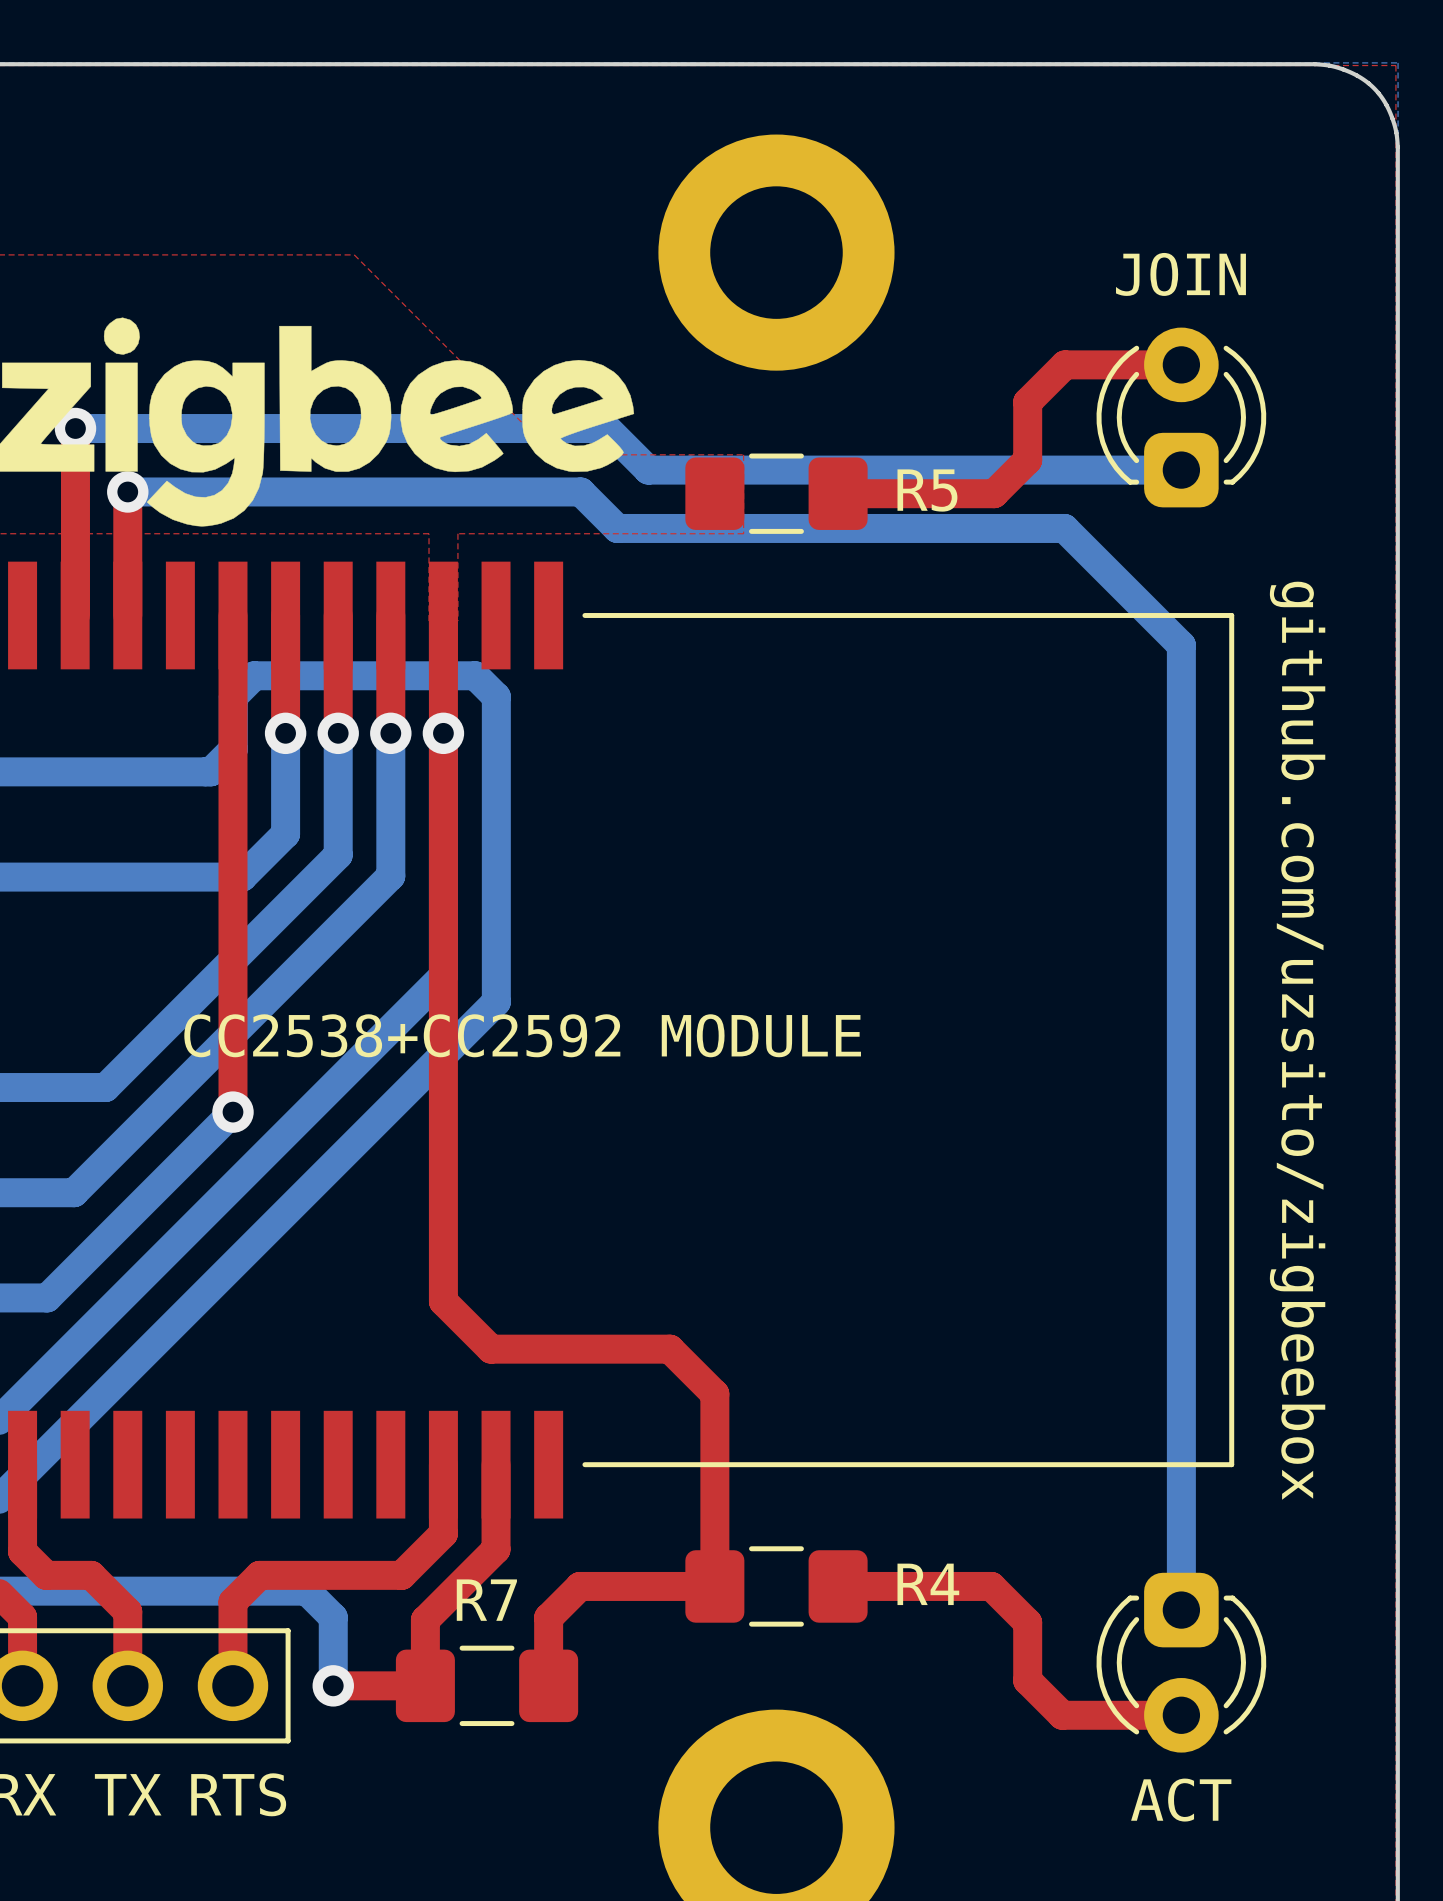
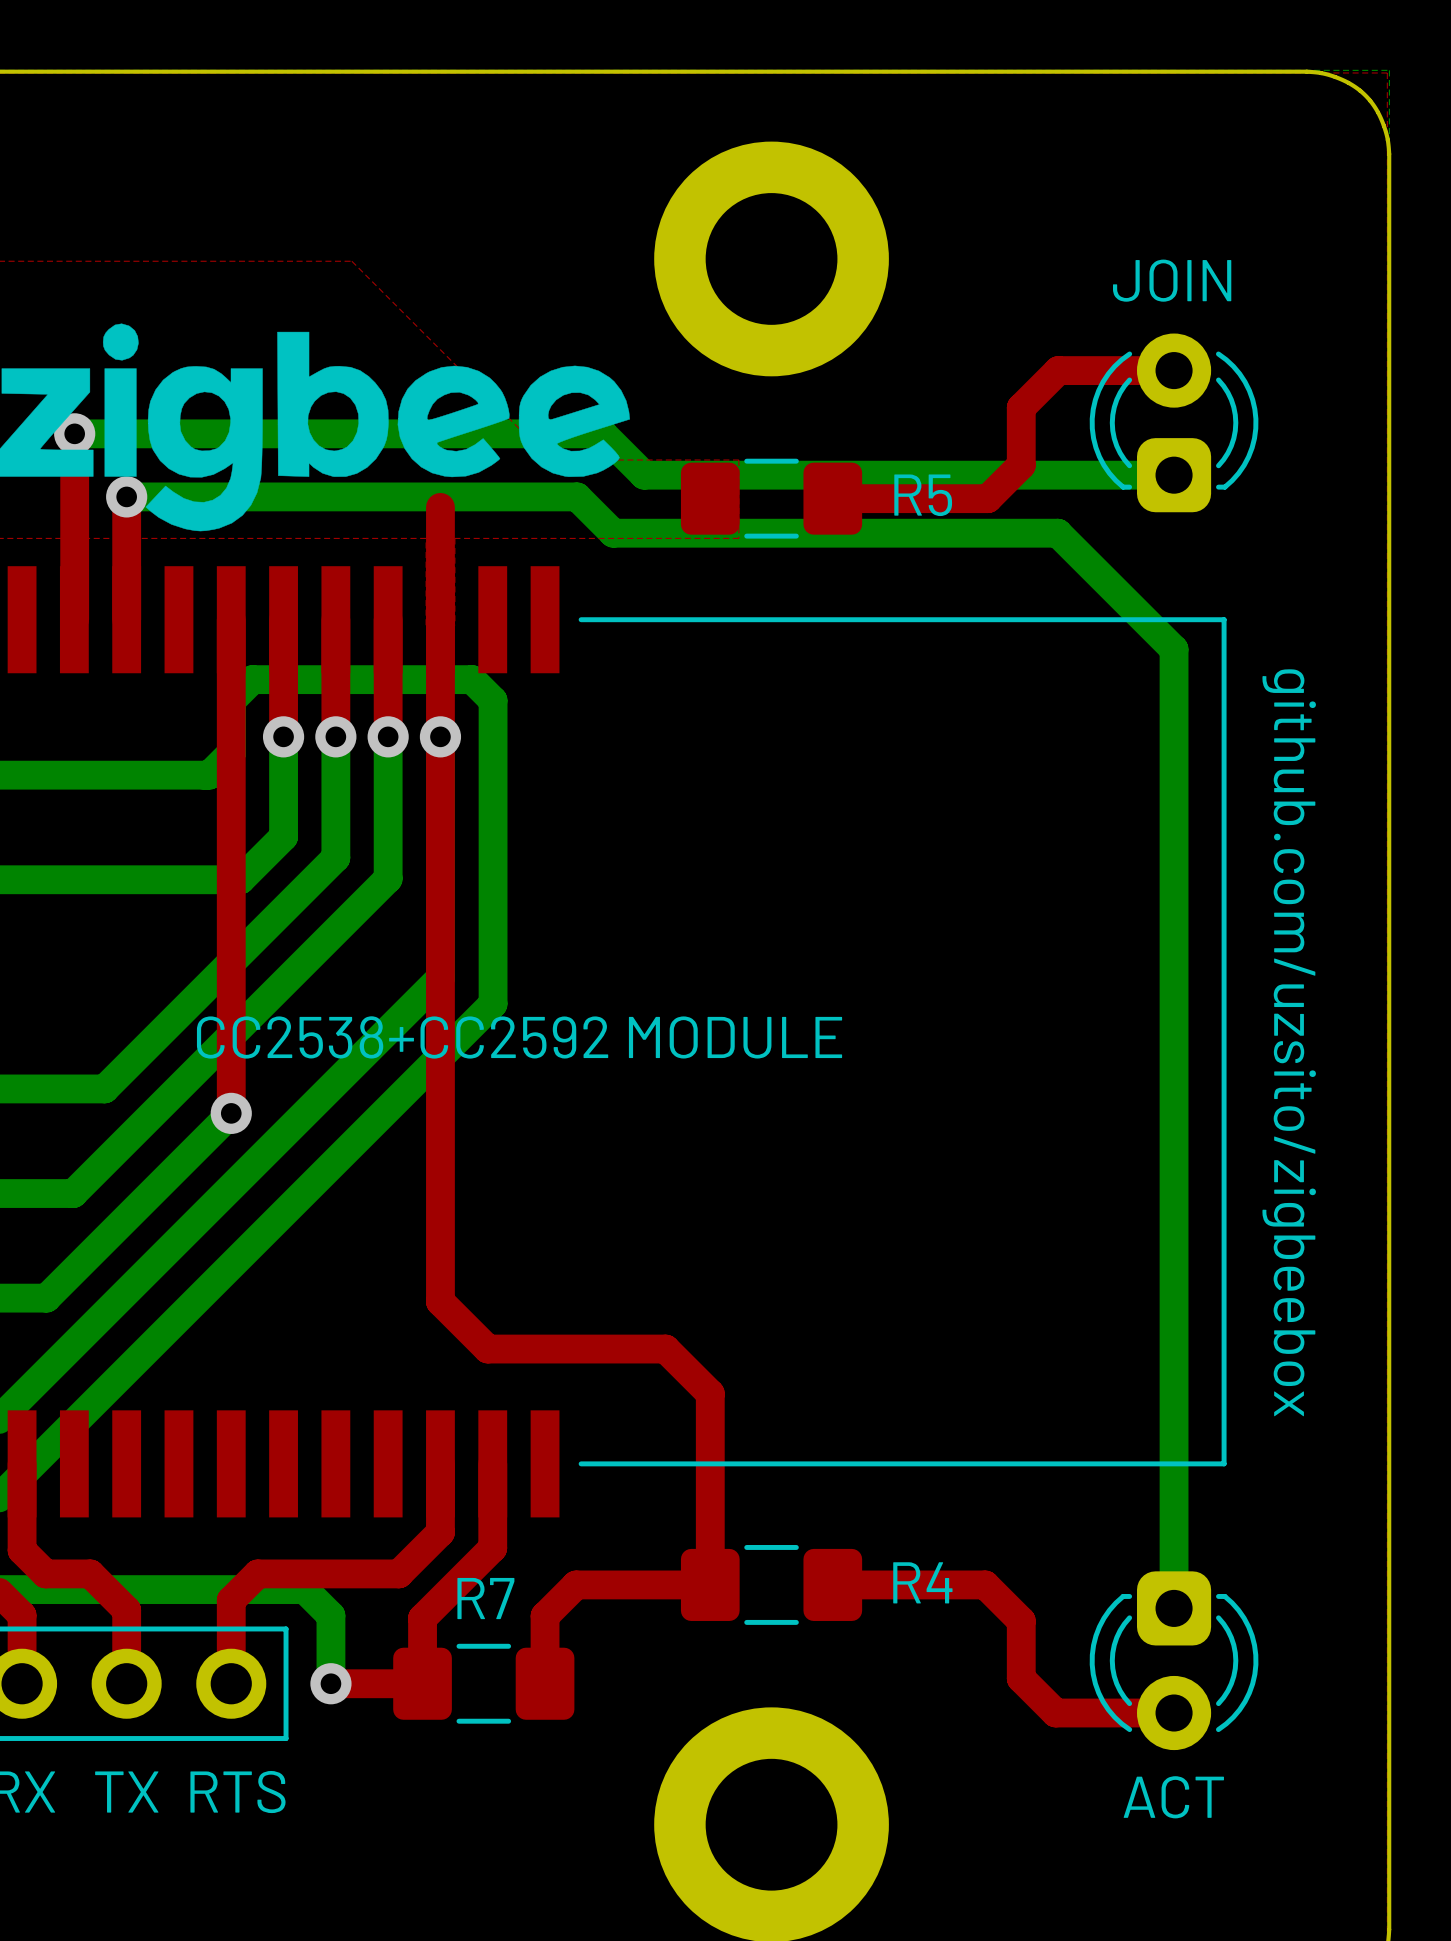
top track: none -> (440, 507) (440, 619)

